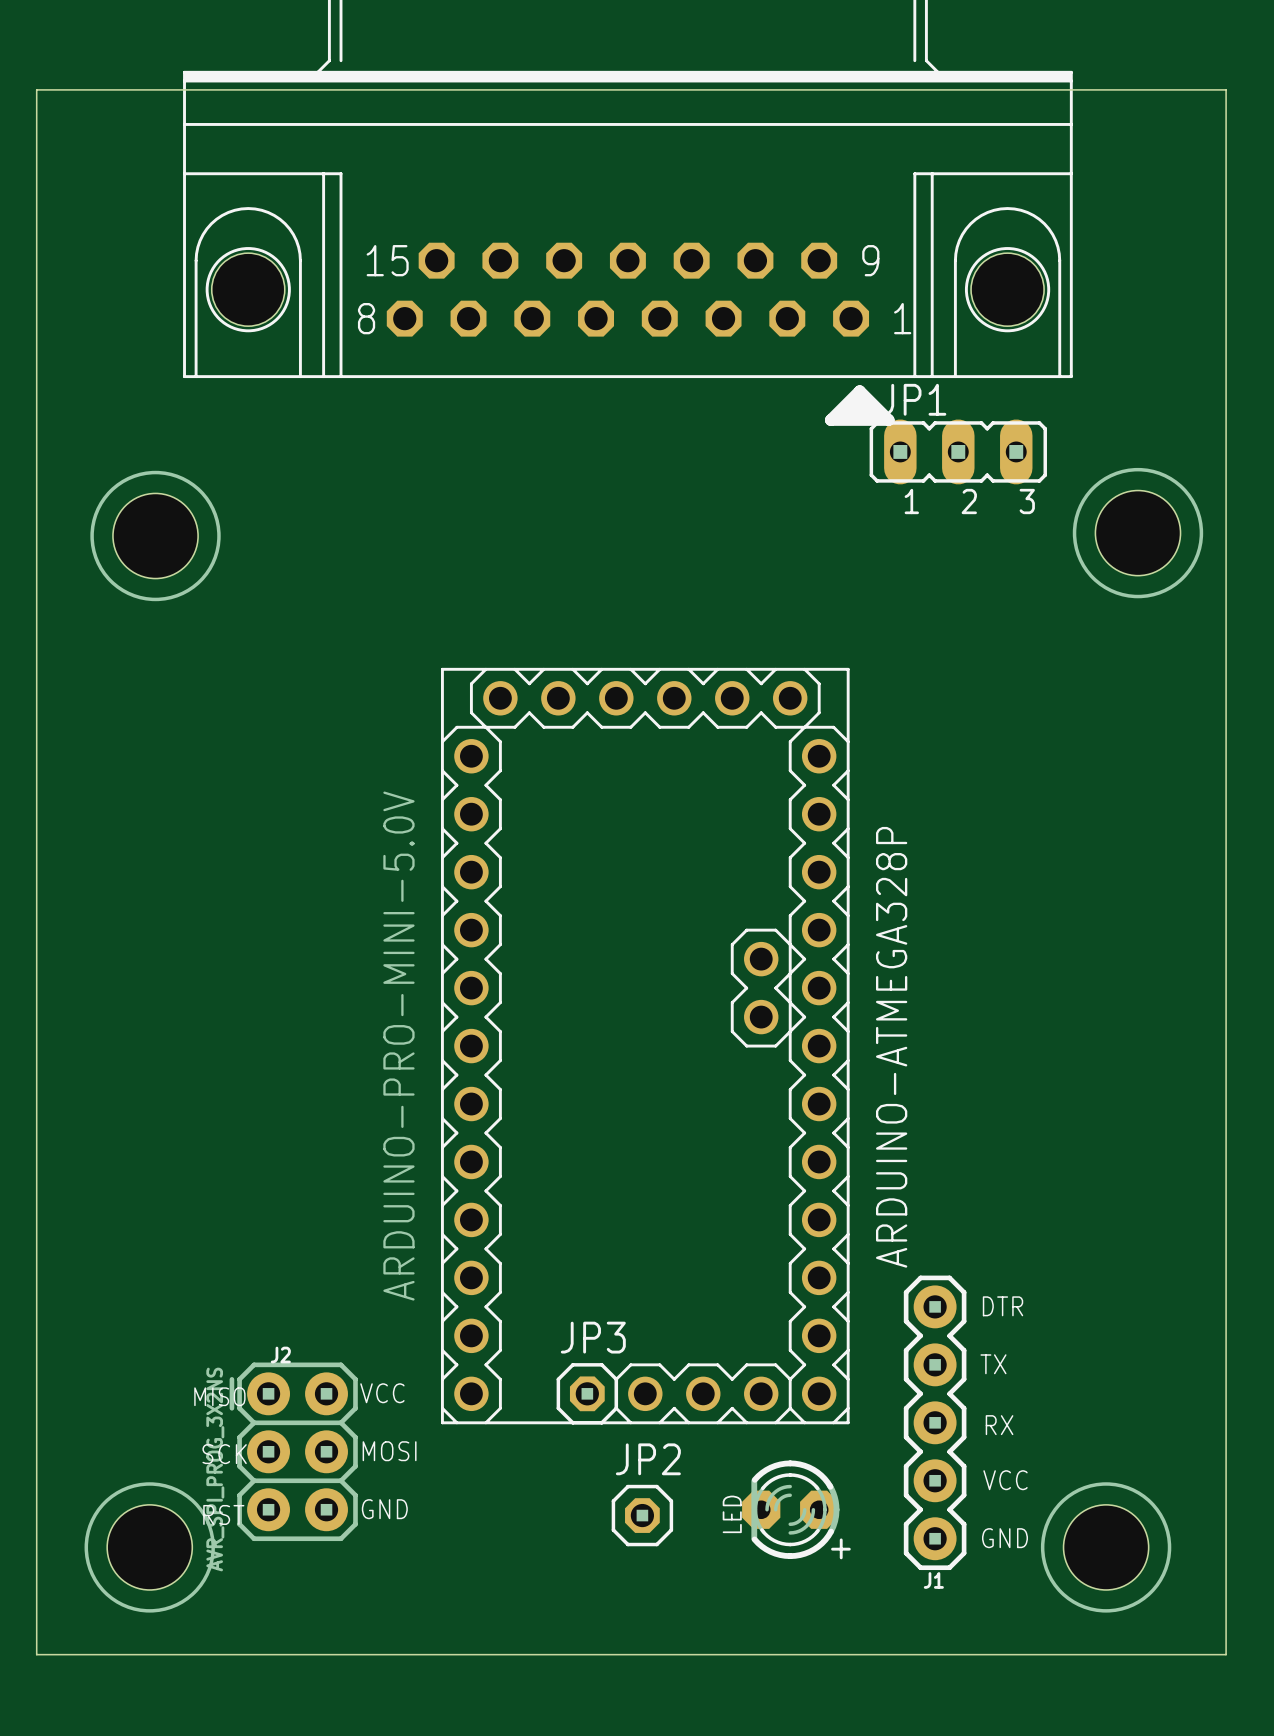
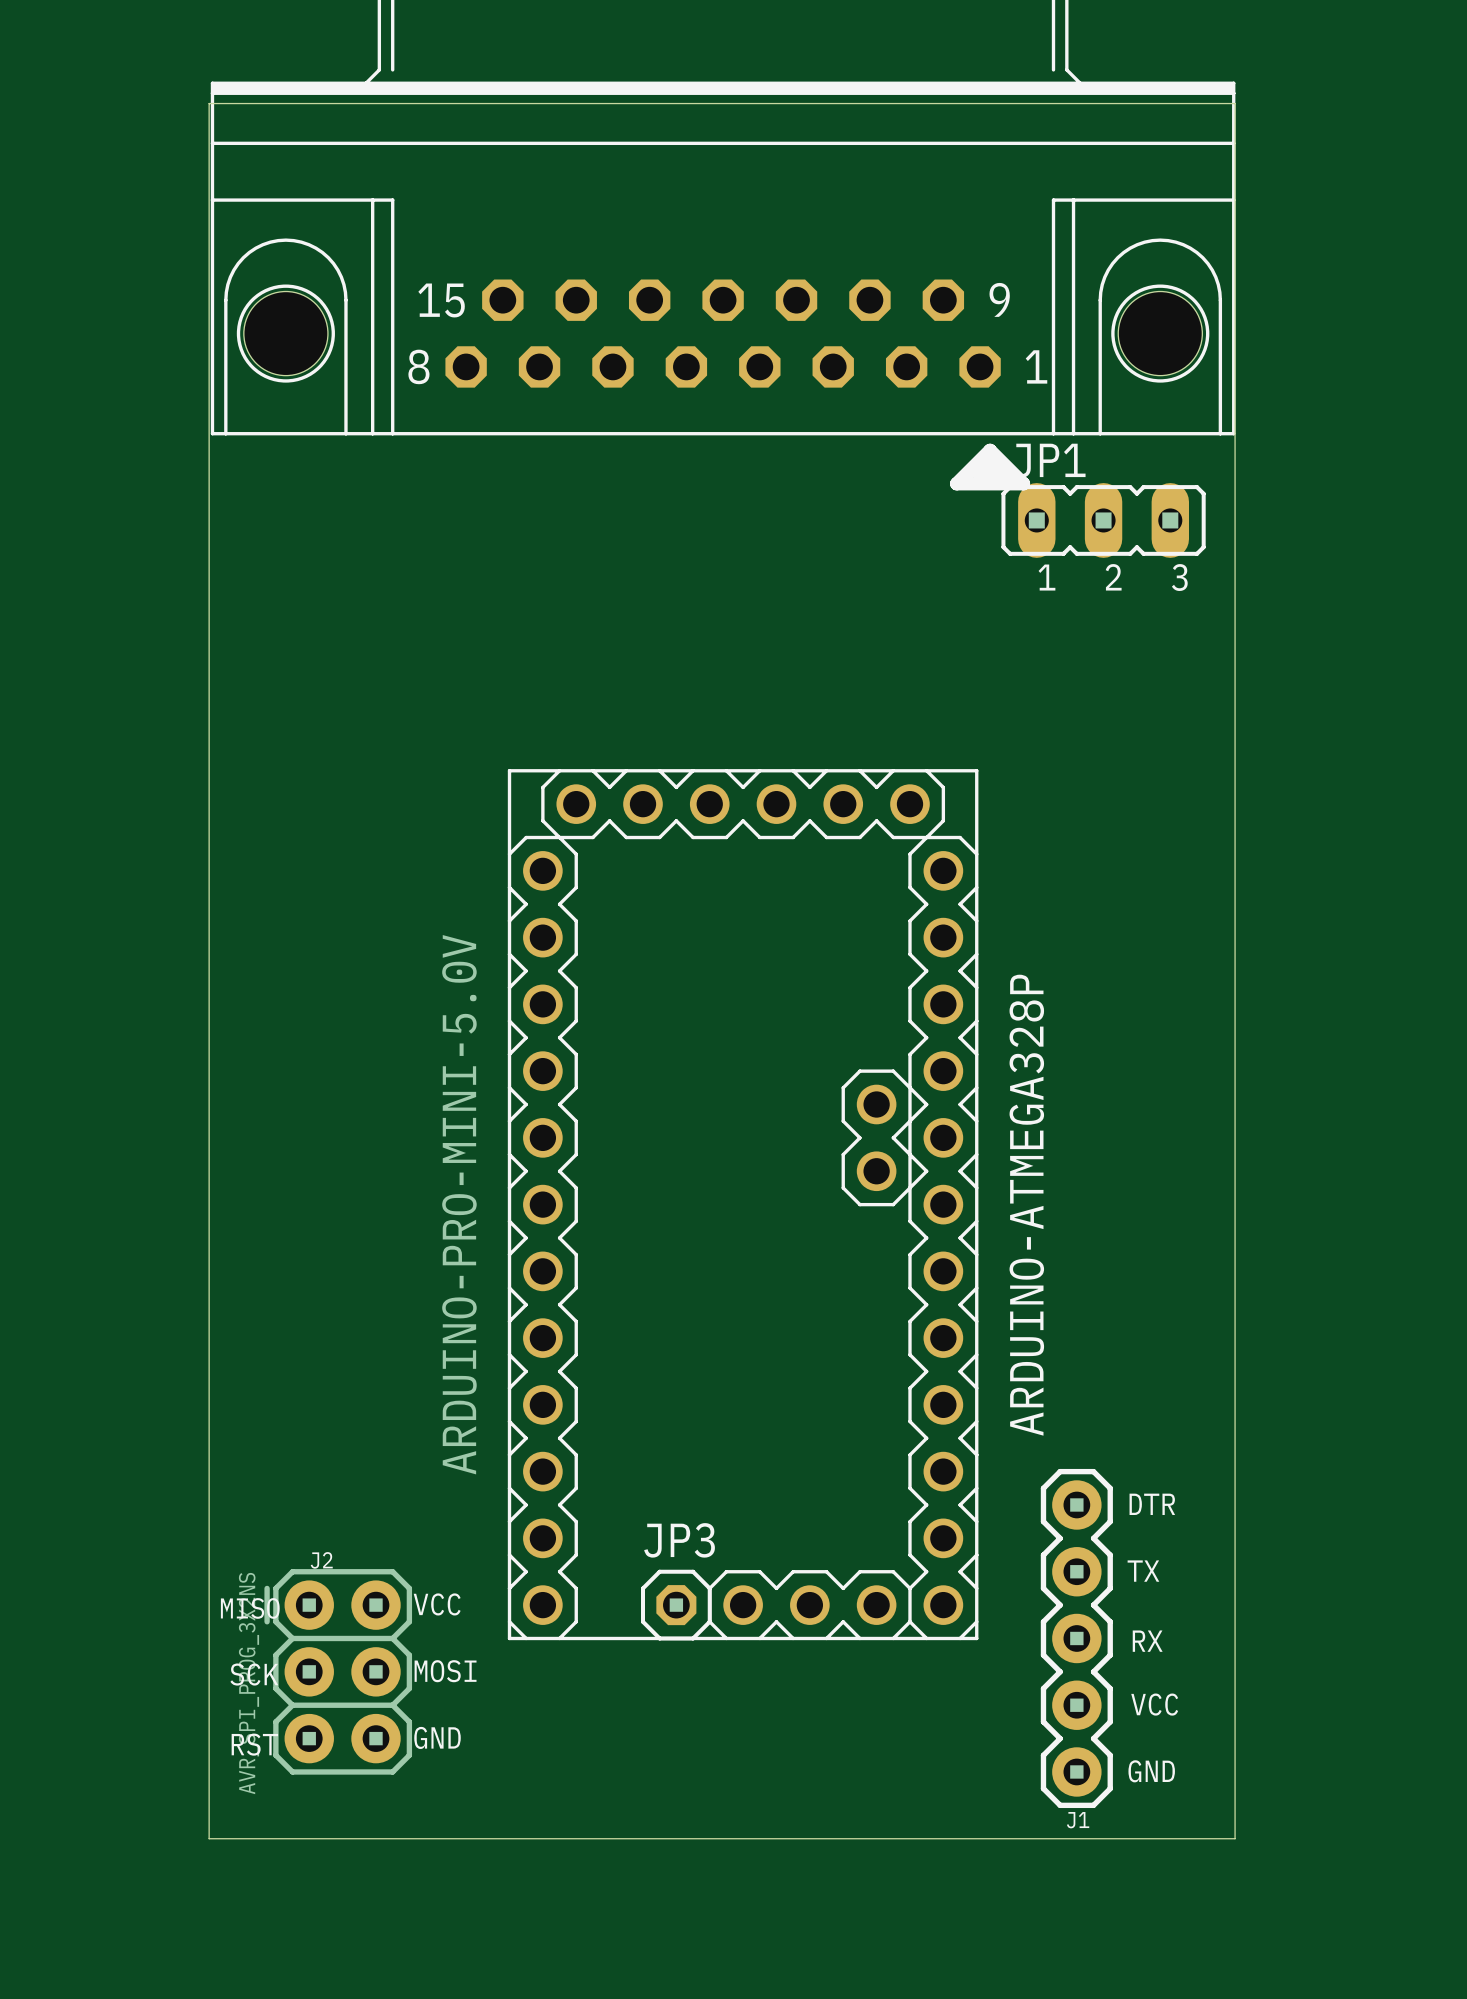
board edge: (181, 89) (36, 89) (36, 1654) (1226, 1654) (1226, 89) (1072, 89) -> (209, 103) (209, 1838) (1235, 1838) (1235, 103)
part: (1137, 533) -> none
part: (155, 535) -> none
LED: (796, 1509) -> none
JP2: (642, 1515) -> none
part: (149, 1547) -> none
part: (1106, 1547) -> none

